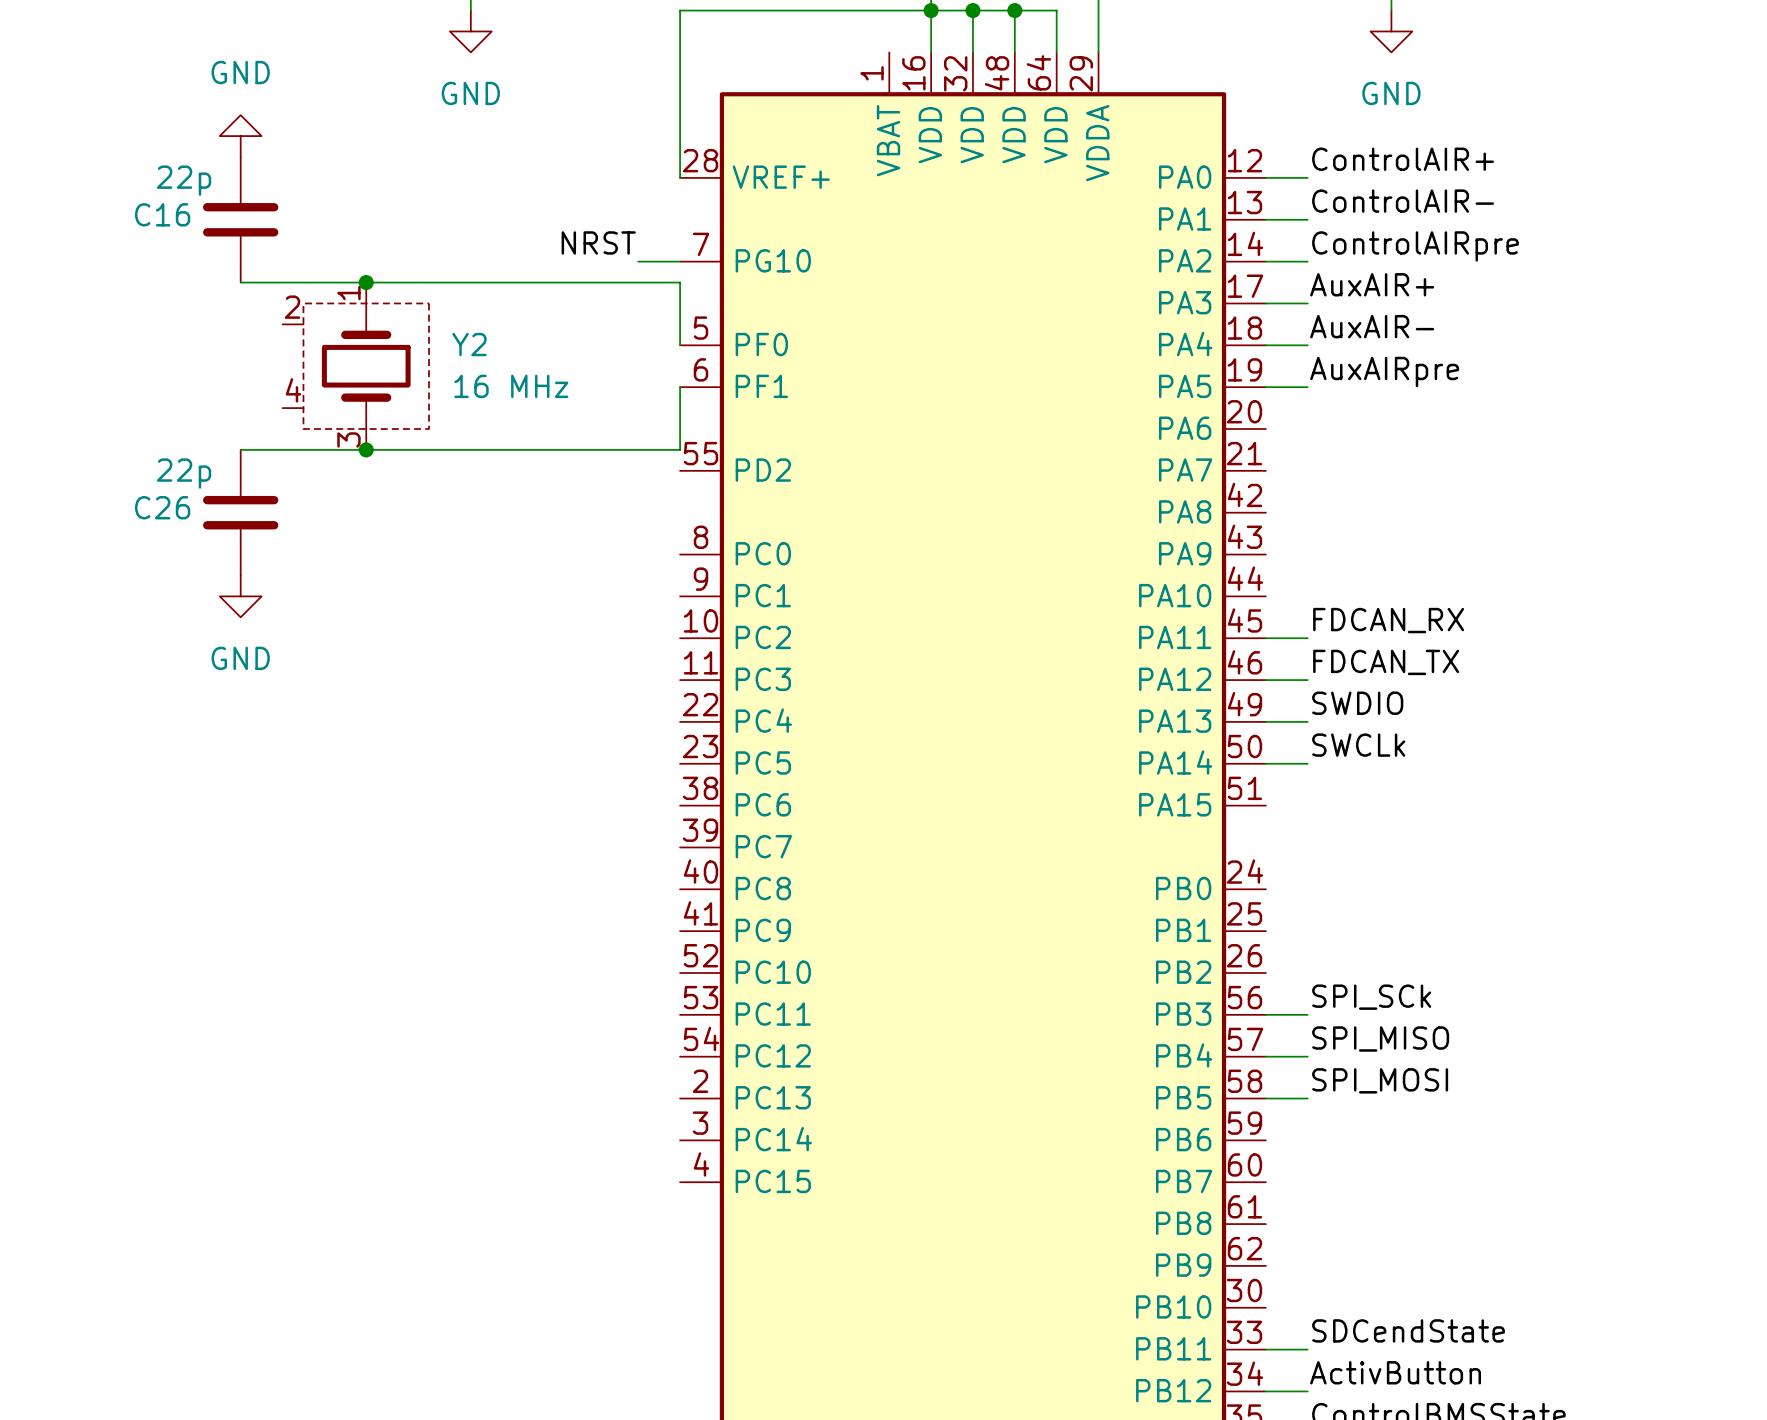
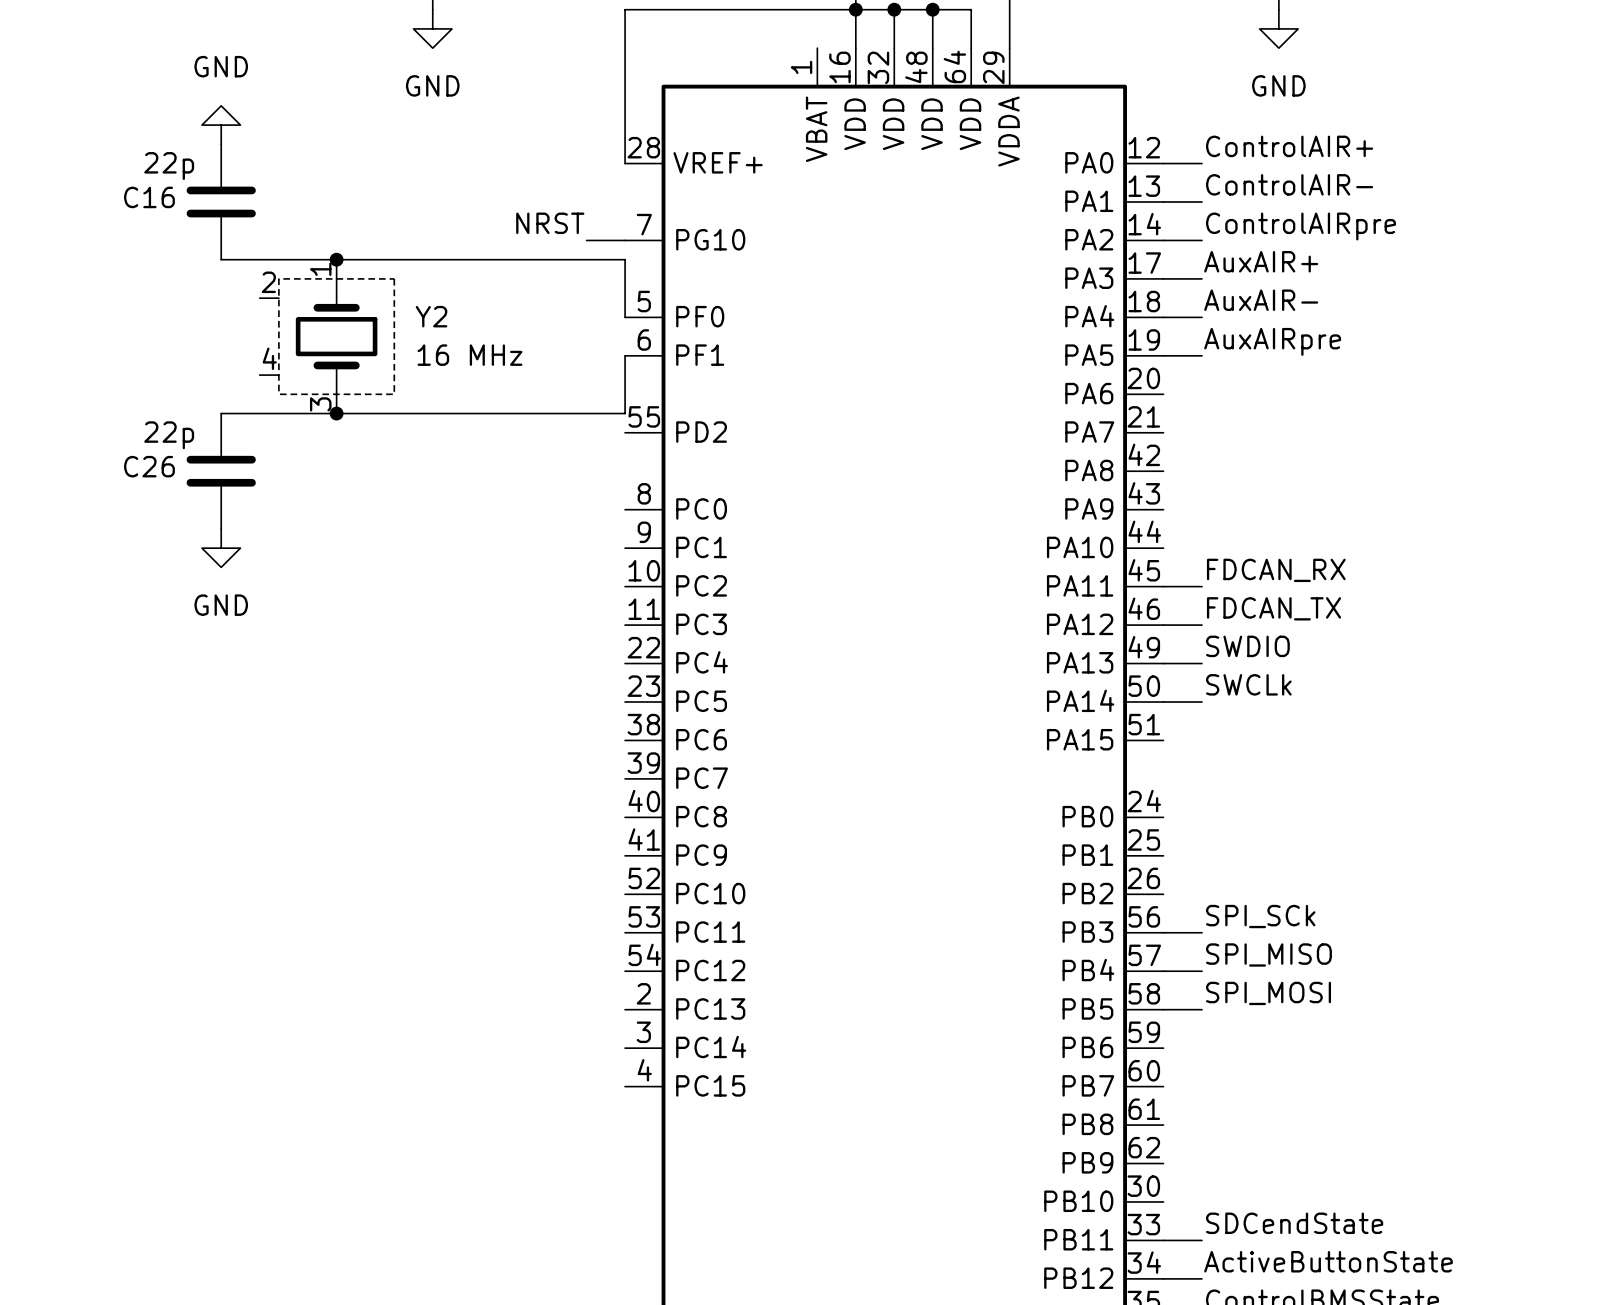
label: ActivButton (1395, 1372) -> ActiveButtonState (1328, 1261)

